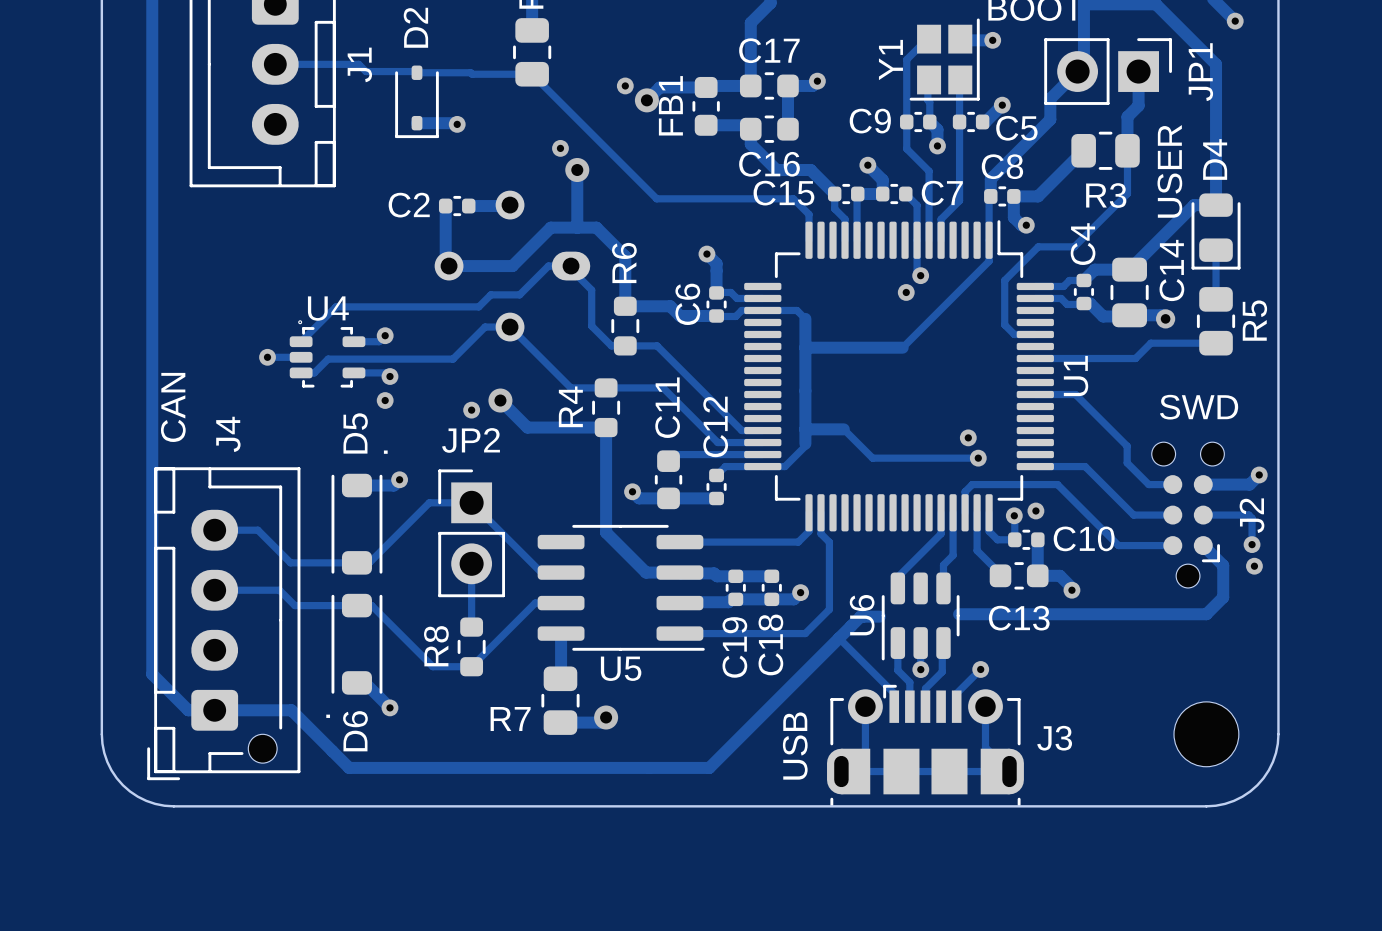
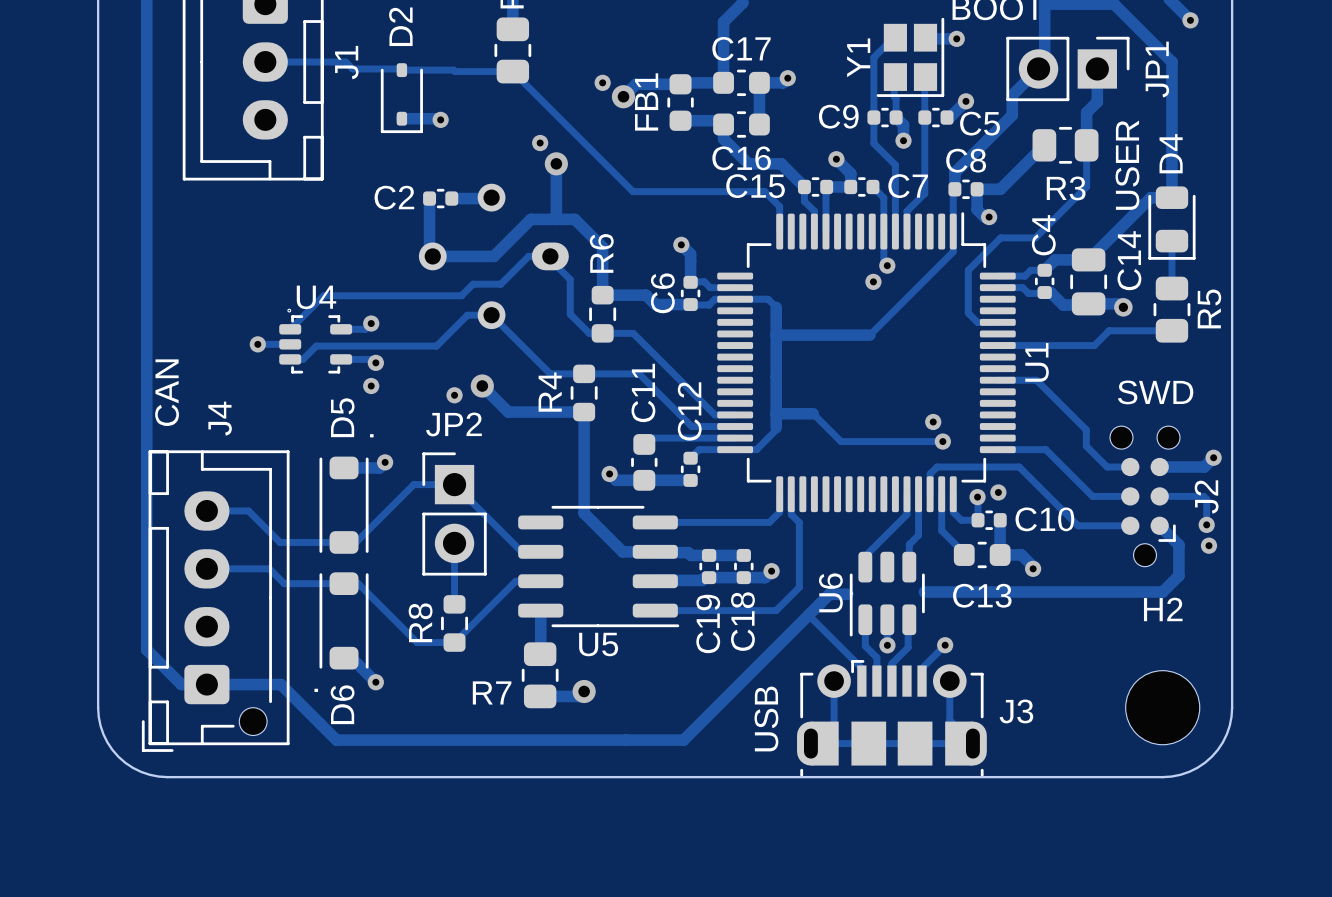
part: (1206, 734) -> none
H2: none -> (1162, 707)

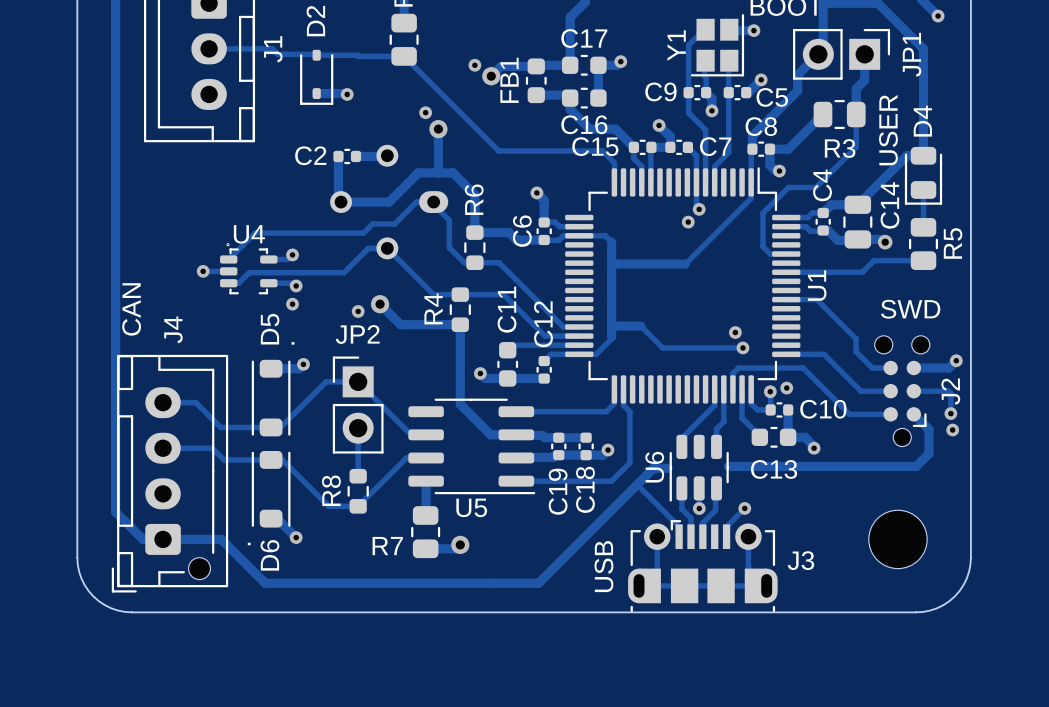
part: none -> (897, 539)
H2: (1162, 707) -> none

